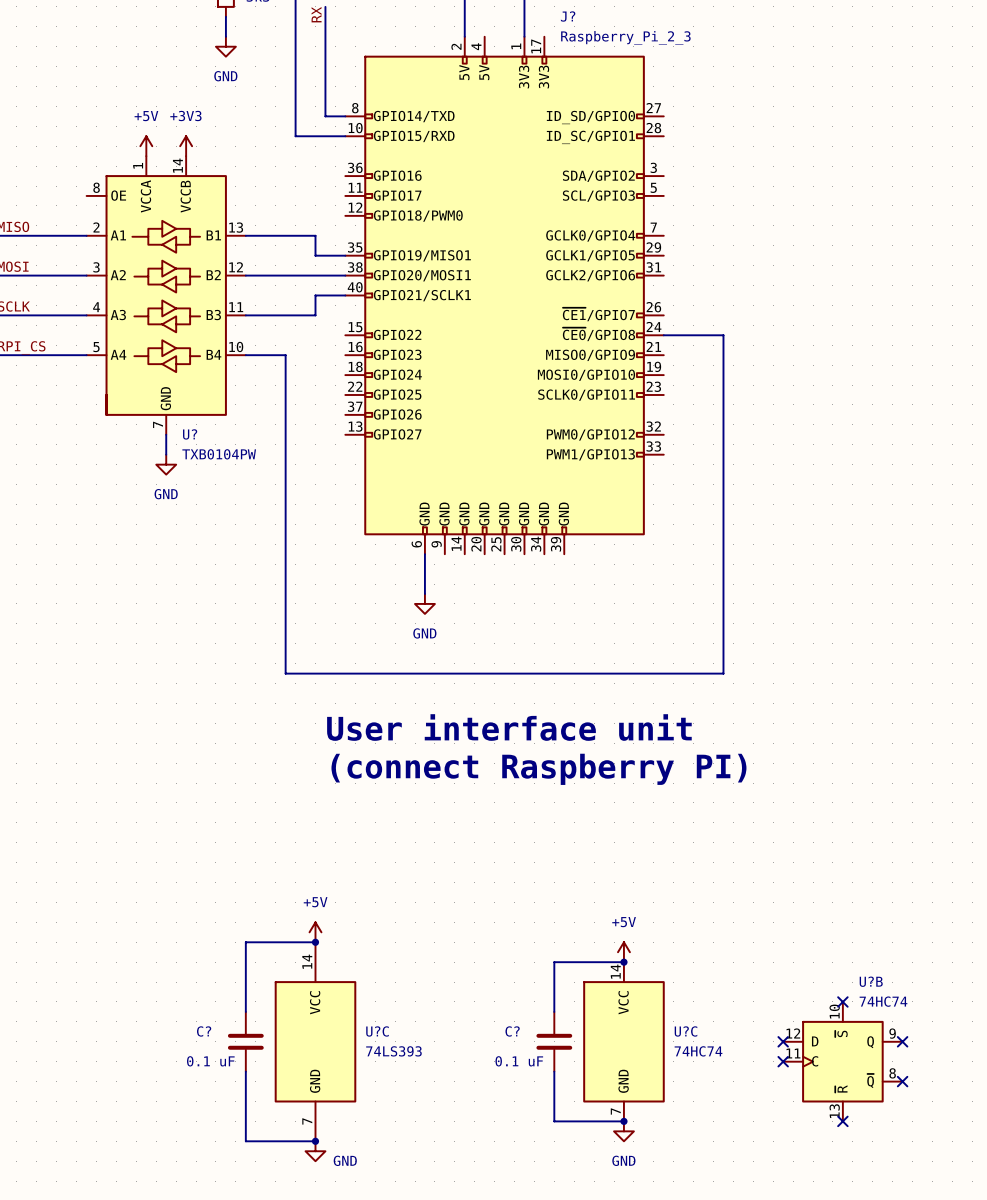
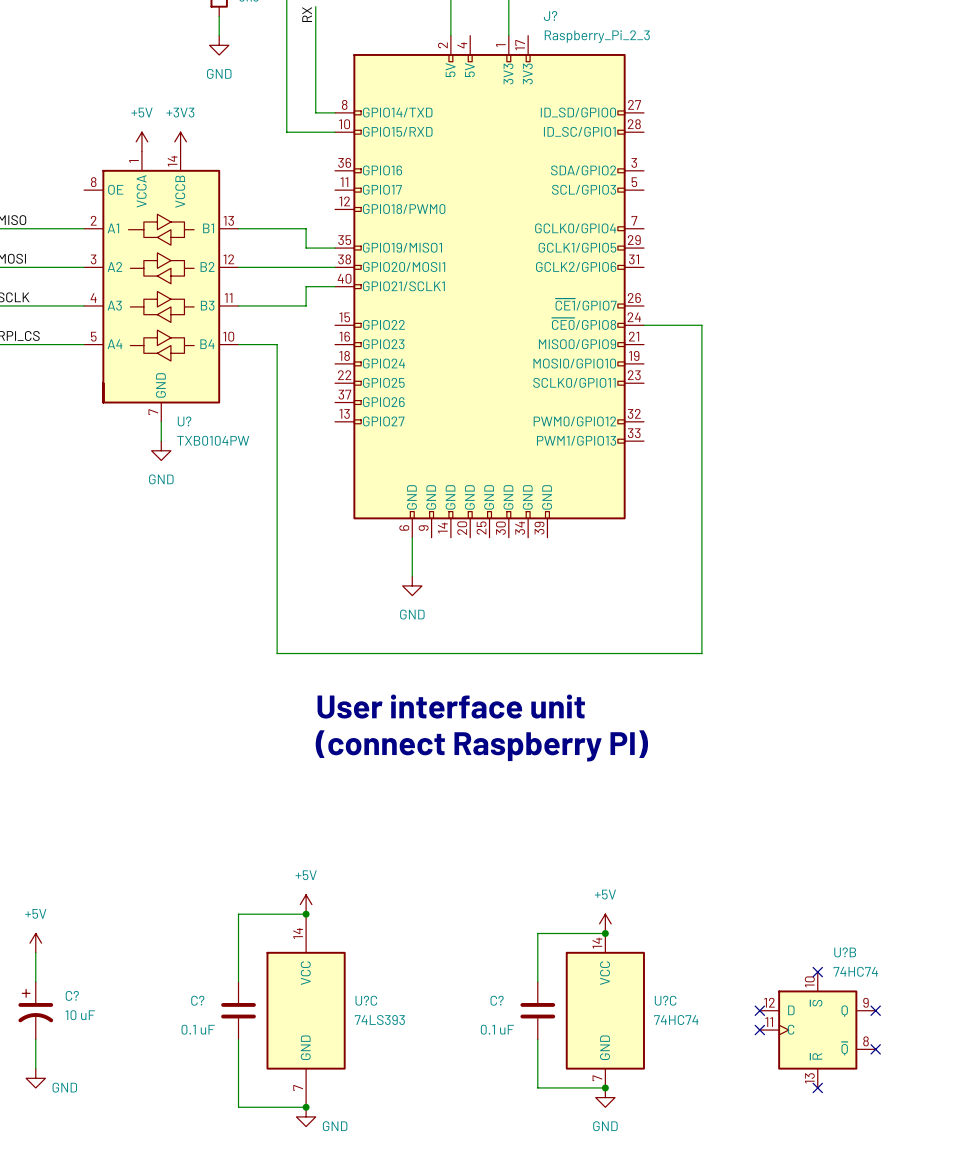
power symbol: none -> +5V (35, 943)
wire: none -> (35, 952) (35, 981)
C?: none -> 10 uF (35, 1010)
wire: none -> (35, 1039) (35, 1068)
power symbol: none -> GND (35, 1078)

